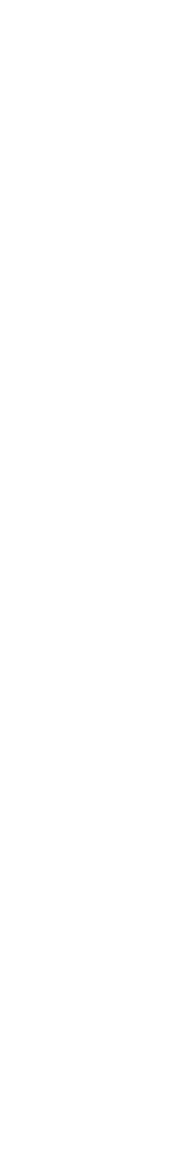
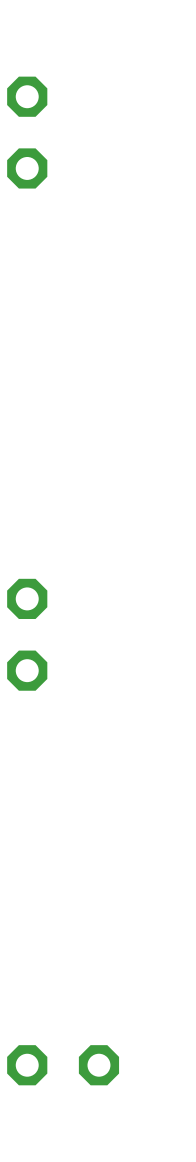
part: none -> (27, 132)
part: none -> (27, 634)
part: none -> (63, 1065)

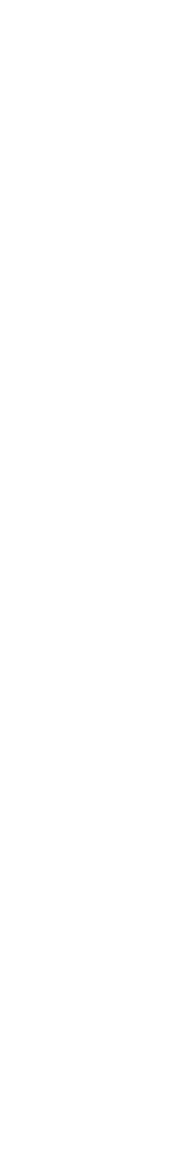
part: (27, 132) -> none
part: (27, 634) -> none
part: (63, 1065) -> none

